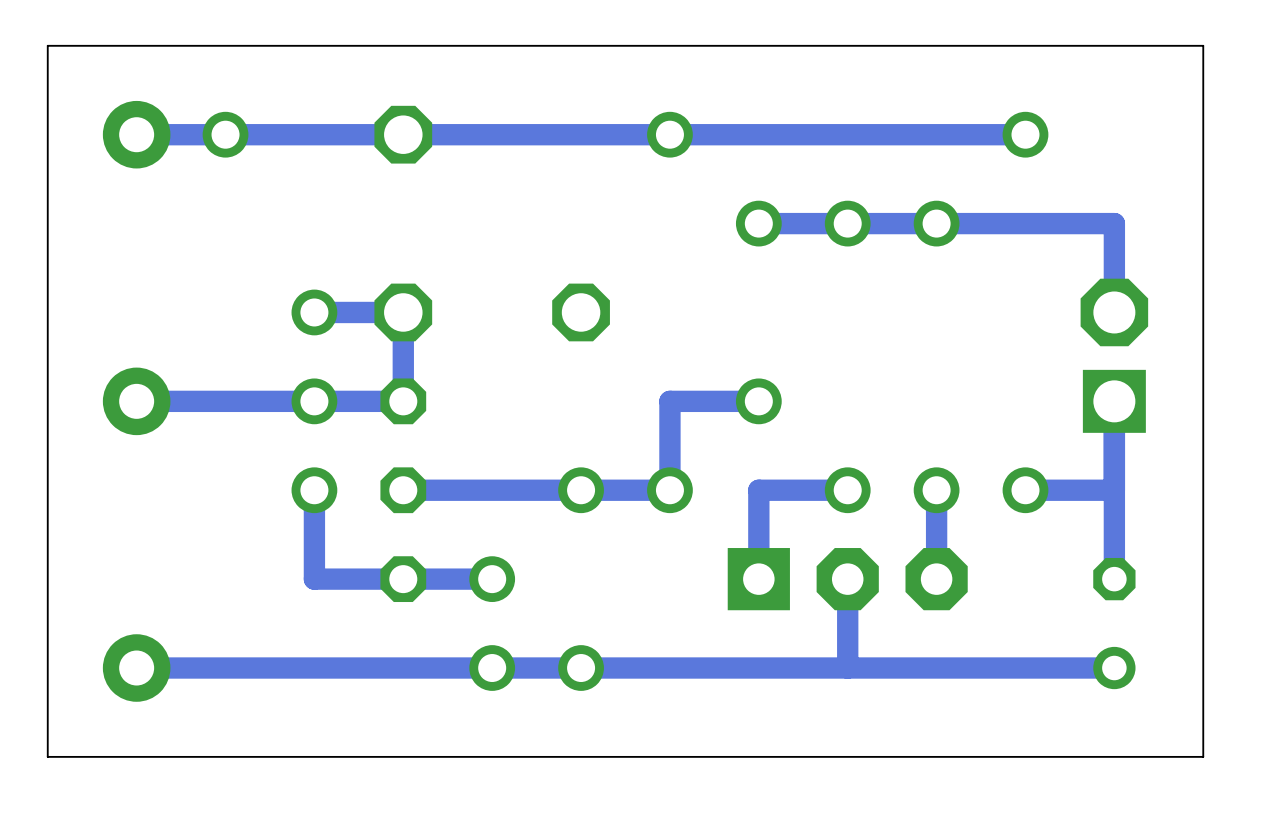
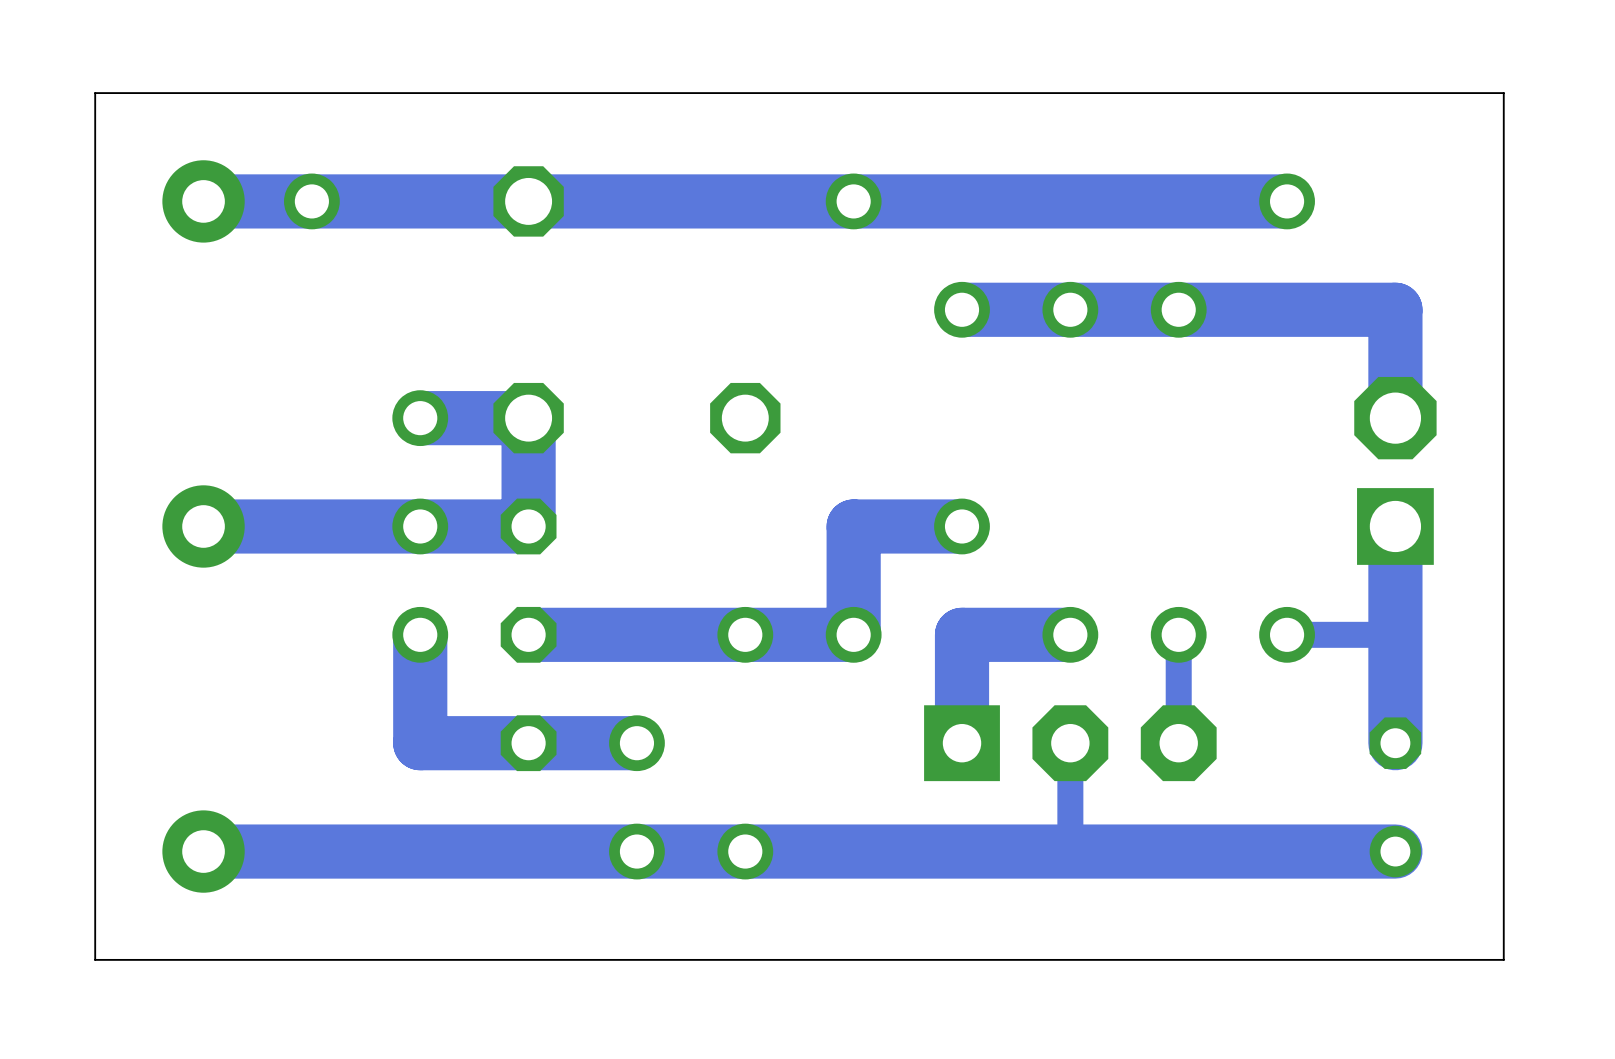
bottom track width: thin (1025, 134) (136, 134) -> thick (1287, 201) (203, 201)
bottom track width: thin (758, 223) (1114, 223) (1114, 312) -> thick (962, 309) (1395, 309) (1395, 418)
bottom track width: thin (314, 312) (403, 312) (403, 401) (136, 401) -> thick (420, 418) (528, 418) (528, 526) (203, 526)
bottom track width: thin (758, 401) (669, 401) (669, 490) (403, 490) -> thick (962, 526) (853, 526) (853, 634) (528, 634)
bottom track width: thin (1114, 401) (1114, 579) -> thick (1395, 526) (1395, 743)
bottom track width: thin (314, 490) (314, 579) (492, 579) -> thick (420, 634) (420, 743) (636, 743)
bottom track width: thin (847, 490) (758, 490) (758, 579) -> thick (1070, 634) (962, 634) (962, 743)
bottom track width: thin (1114, 668) (136, 668) -> thick (1395, 851) (203, 851)

